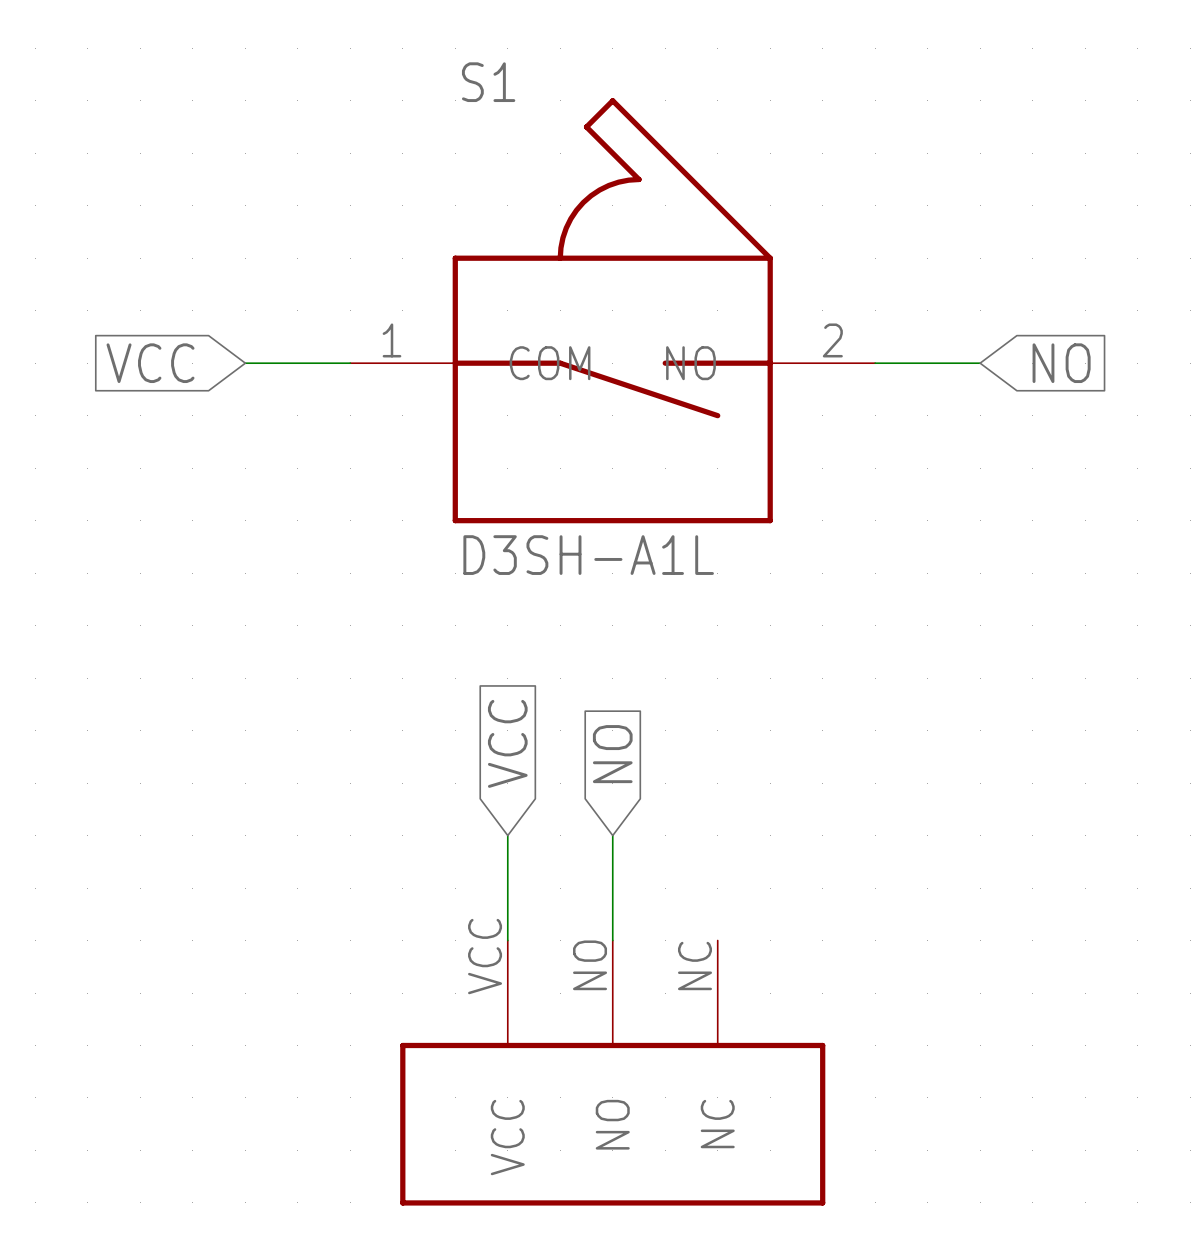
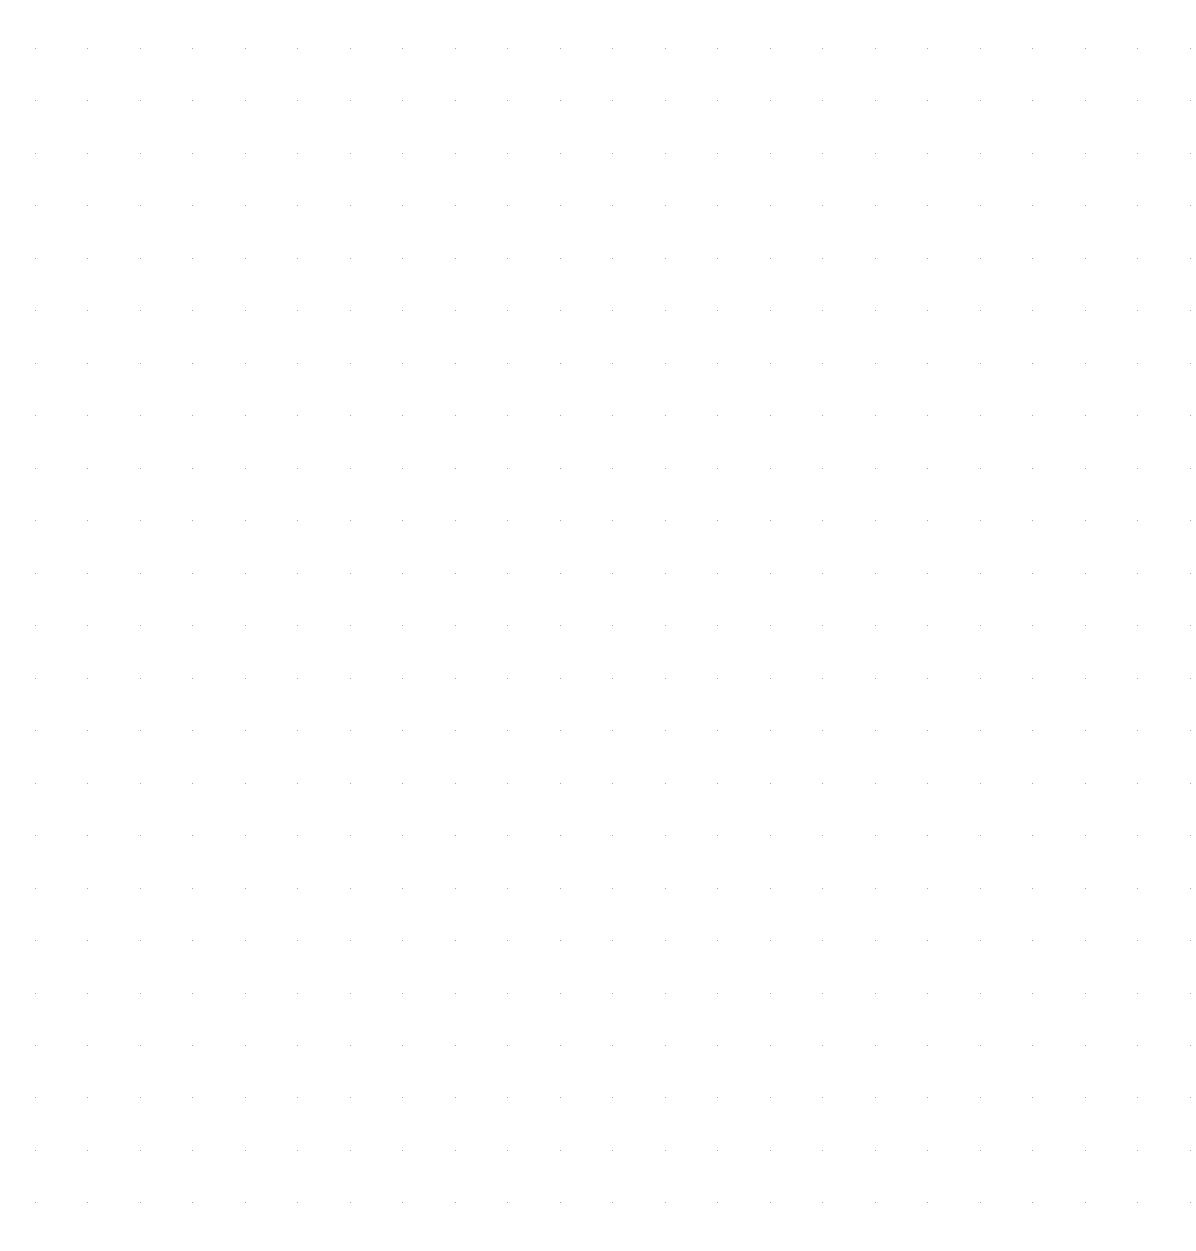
S1: D3SH-A1L (612, 310) -> none
global label: VCC (150, 363) -> none
wire: (245, 363) (350, 363) -> none
wire: (875, 363) (980, 363) -> none
global label: NO (1061, 363) -> none
global label: VCC (507, 743) -> none
global label: NO (612, 754) -> none
wire: (507, 835) (507, 940) -> none
wire: (612, 835) (612, 940) -> none
part: (612, 1073) -> none

